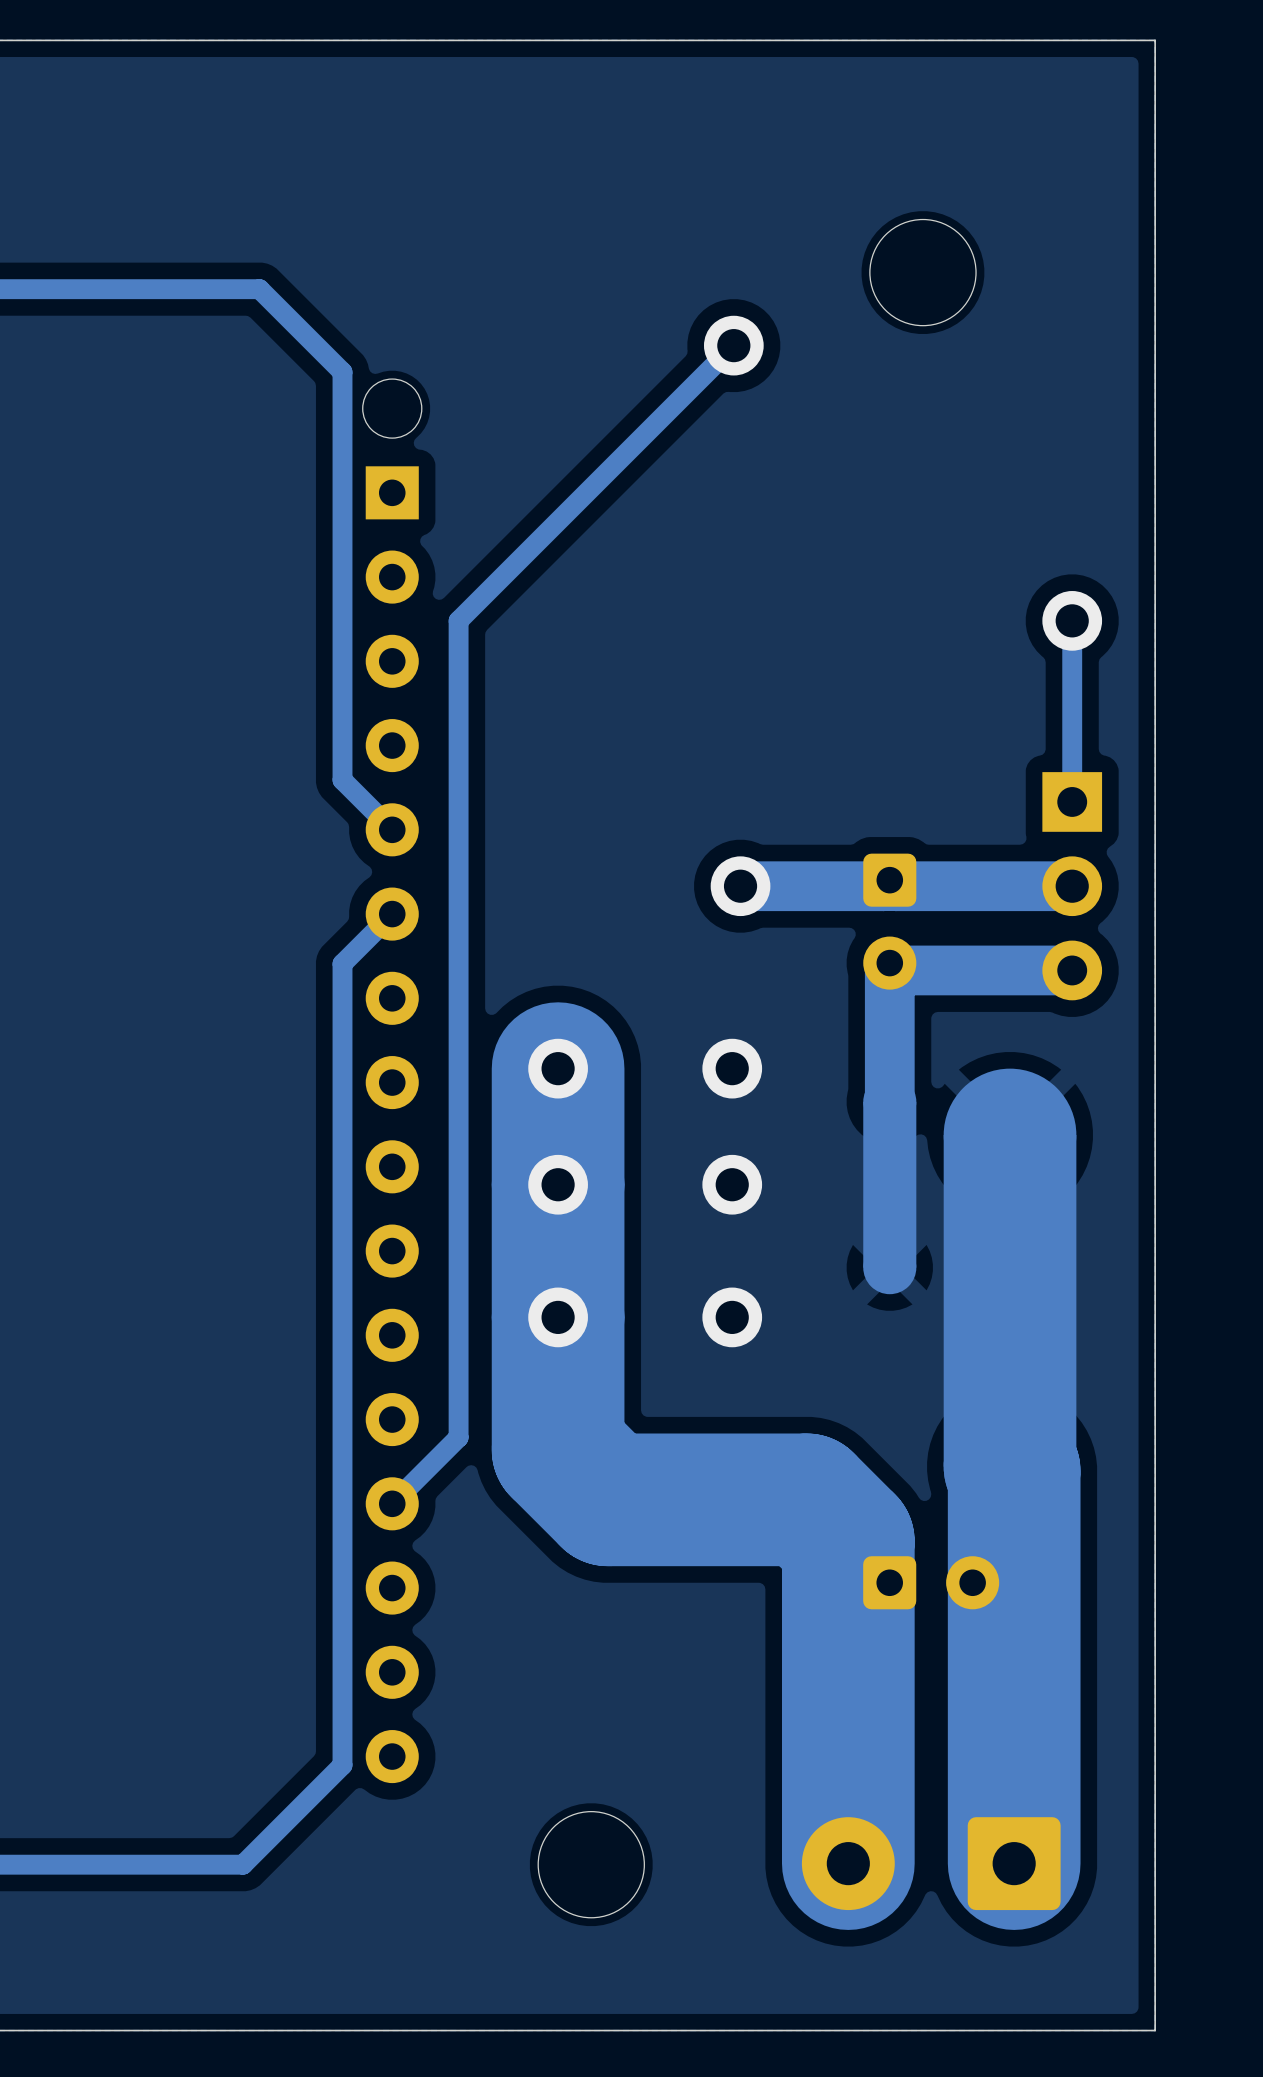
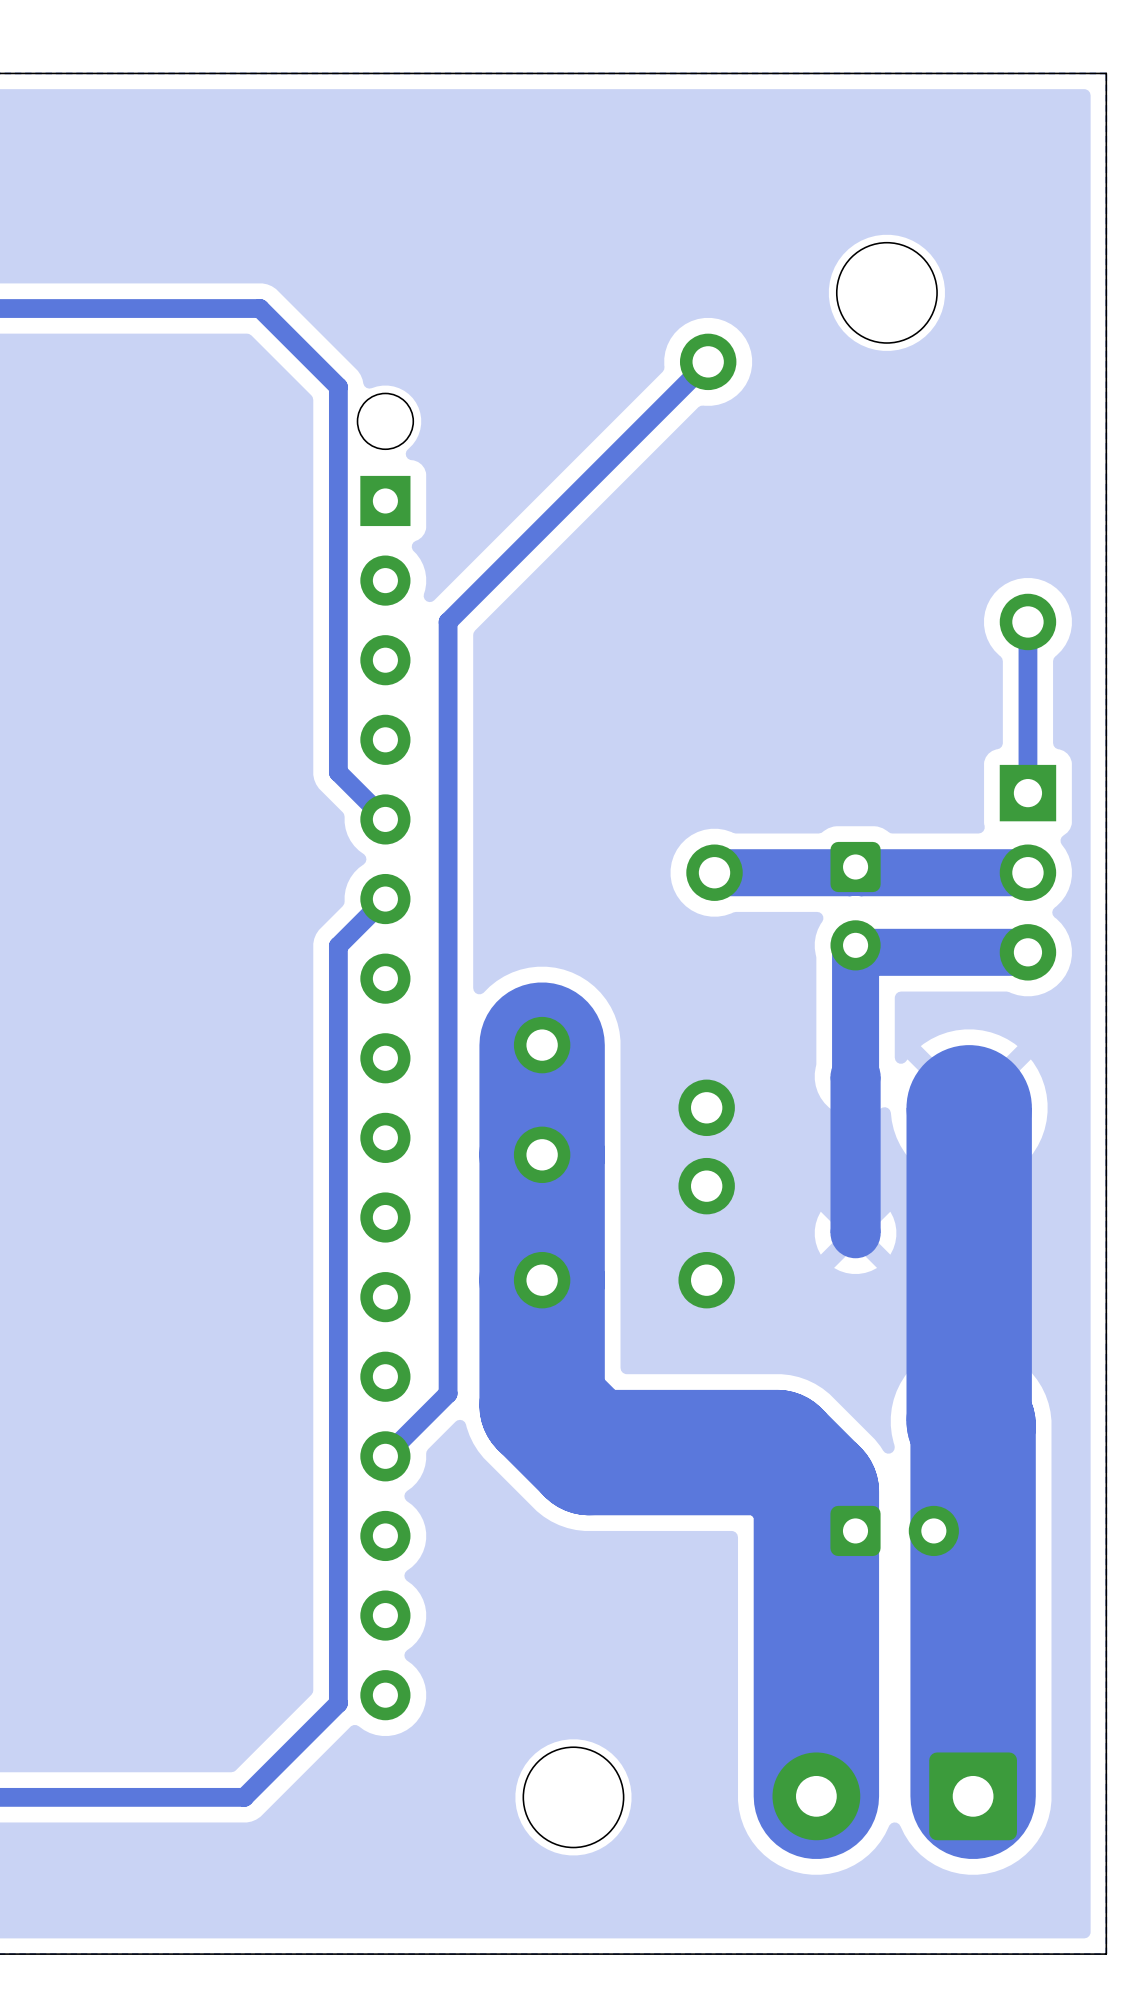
via: (732, 1068) -> none
via: none -> (706, 1107)
via: (732, 1184) -> none
via: none -> (706, 1186)

